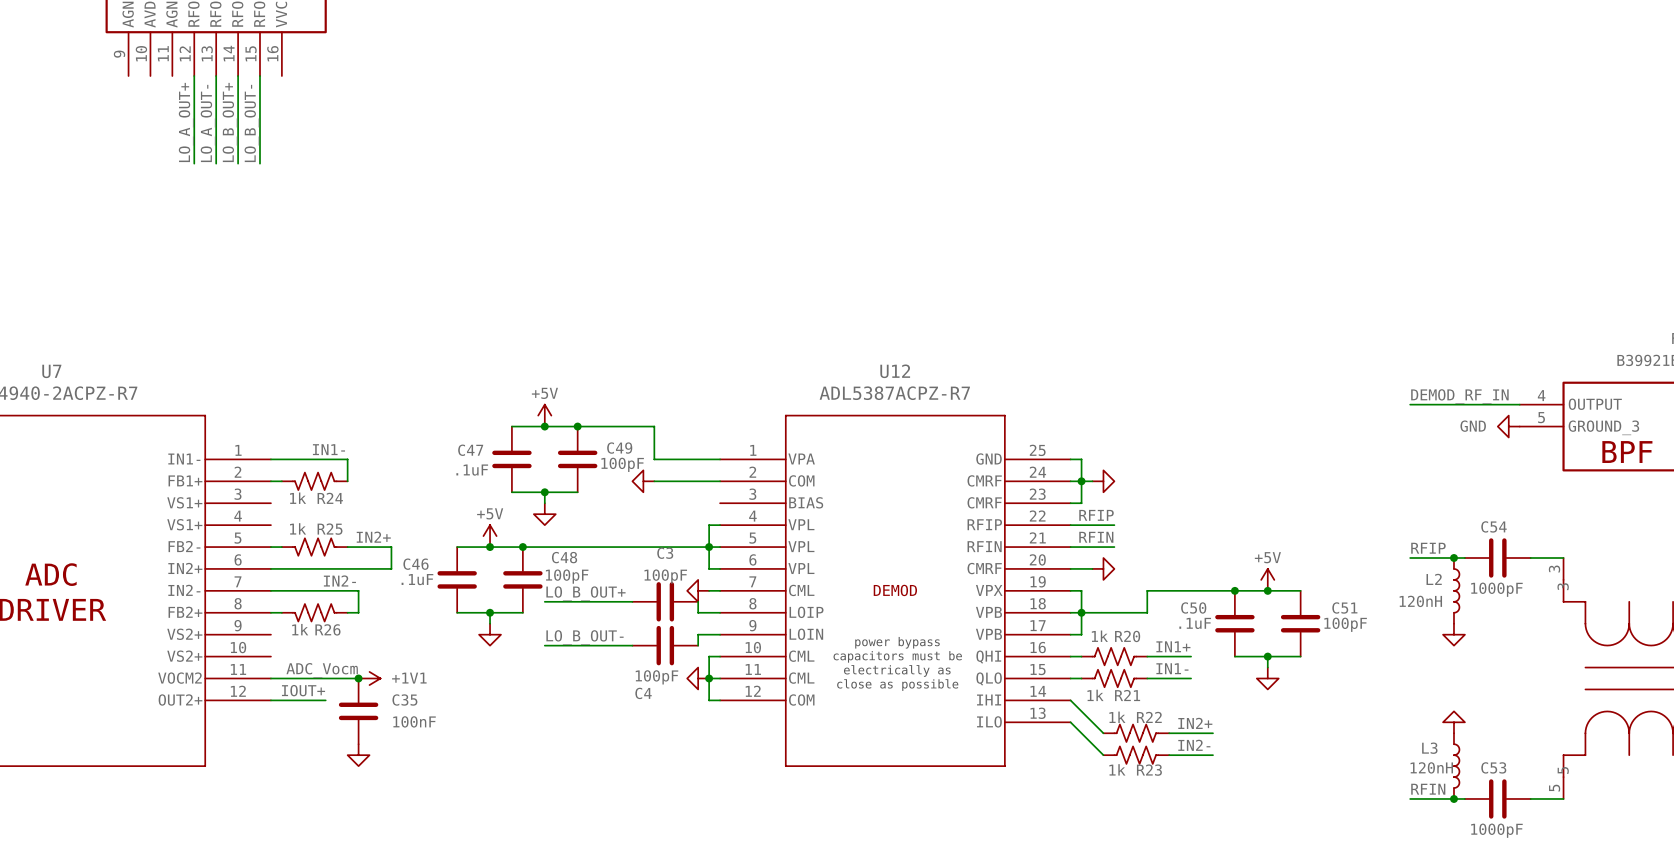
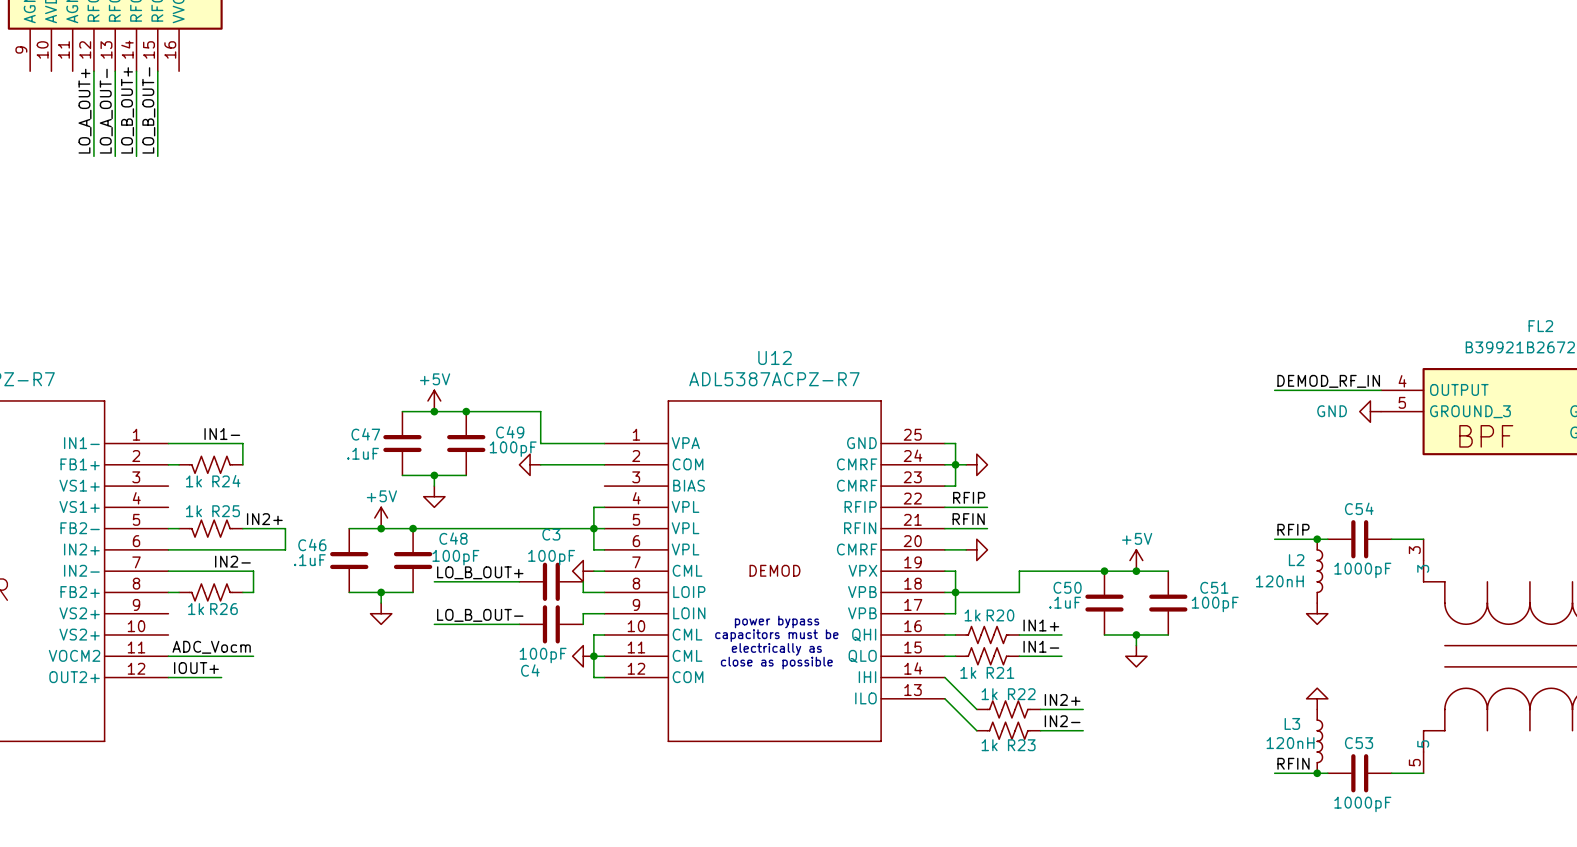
junction: (358, 678) -> none
power symbol: +1V1 (369, 678) -> none
C35: 100nF (358, 711) -> none
power symbol: (358, 755) -> none

